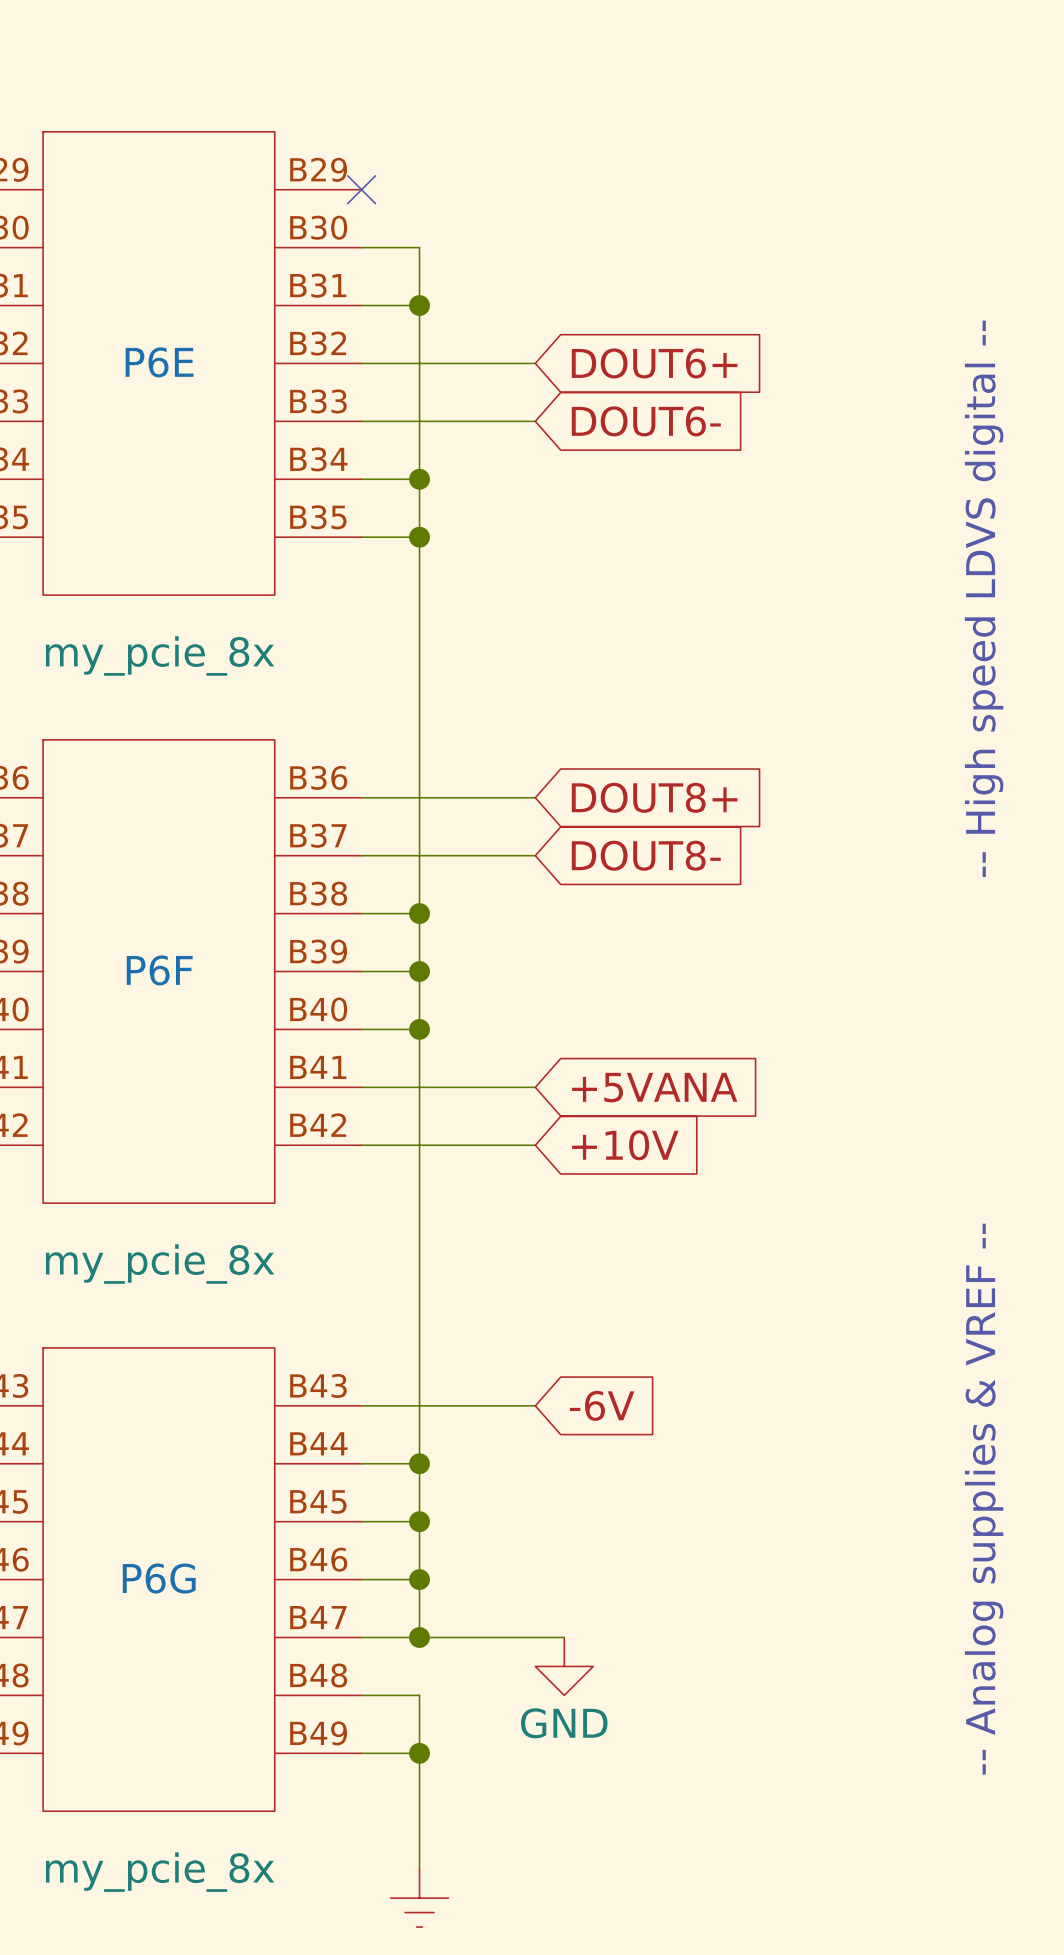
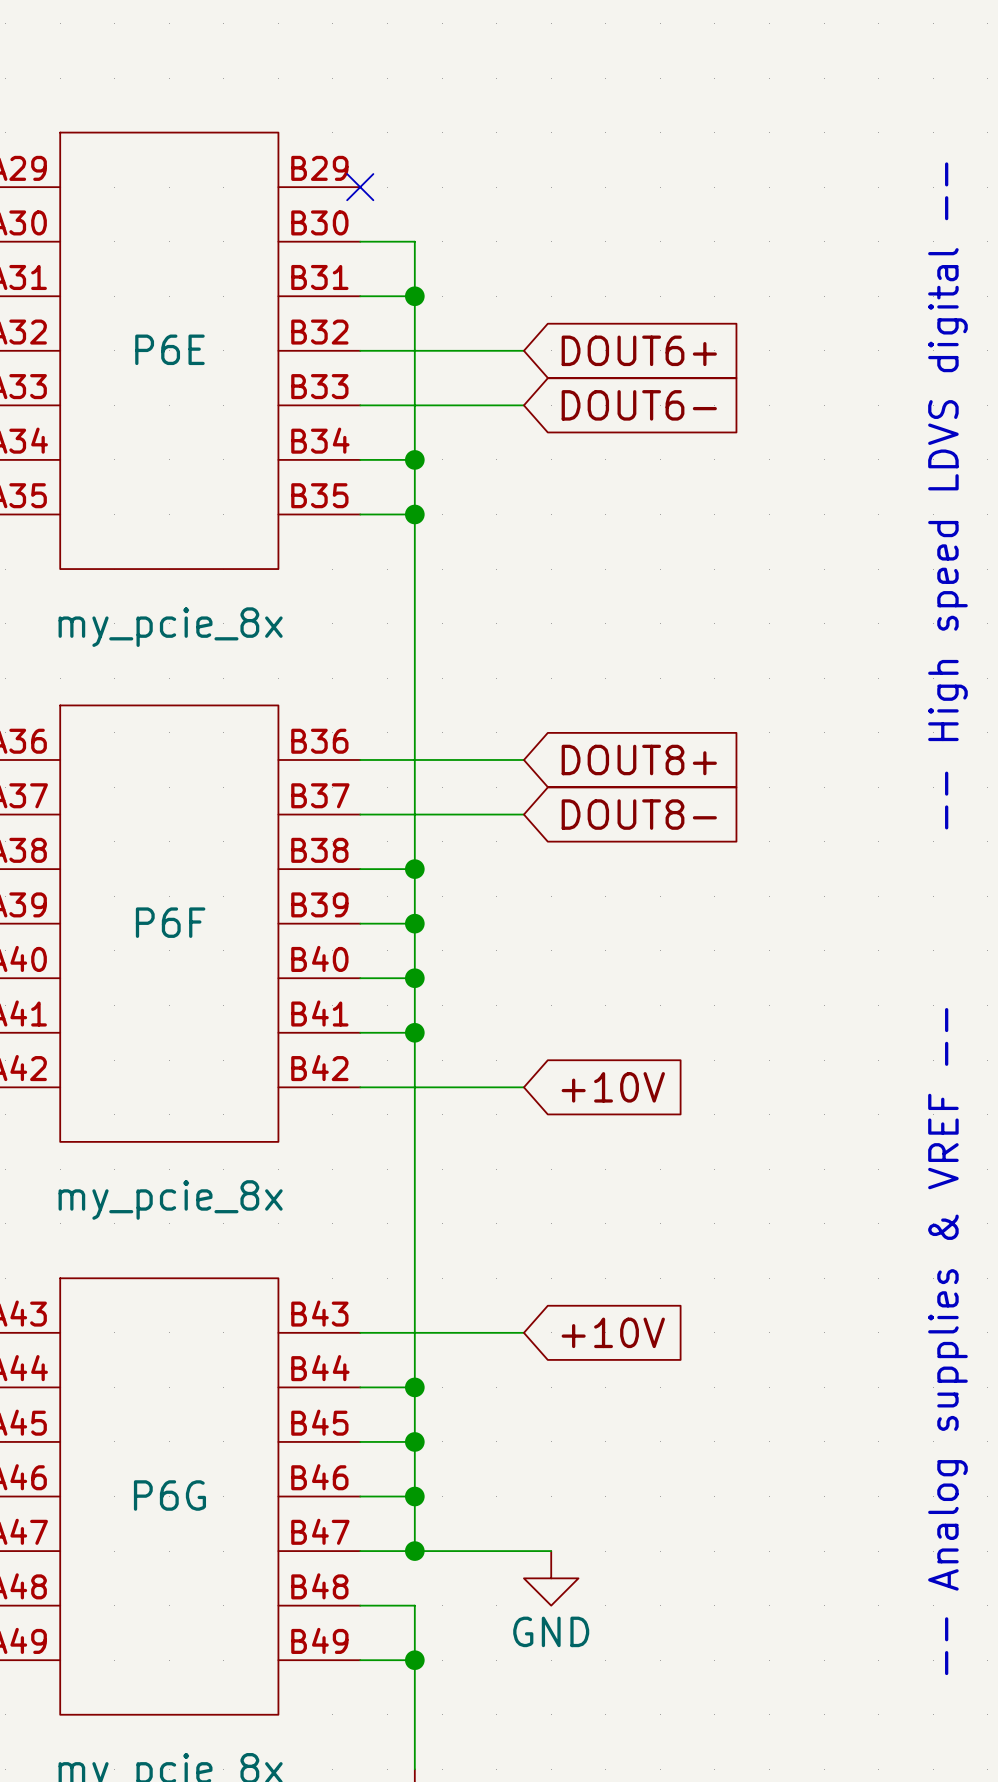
wire: (419, 1087) (535, 1087) -> none
junction: none -> (414, 1032)
global label: +5VANA (654, 1087) -> none
global label: -6V (602, 1405) -> +10V (613, 1332)

